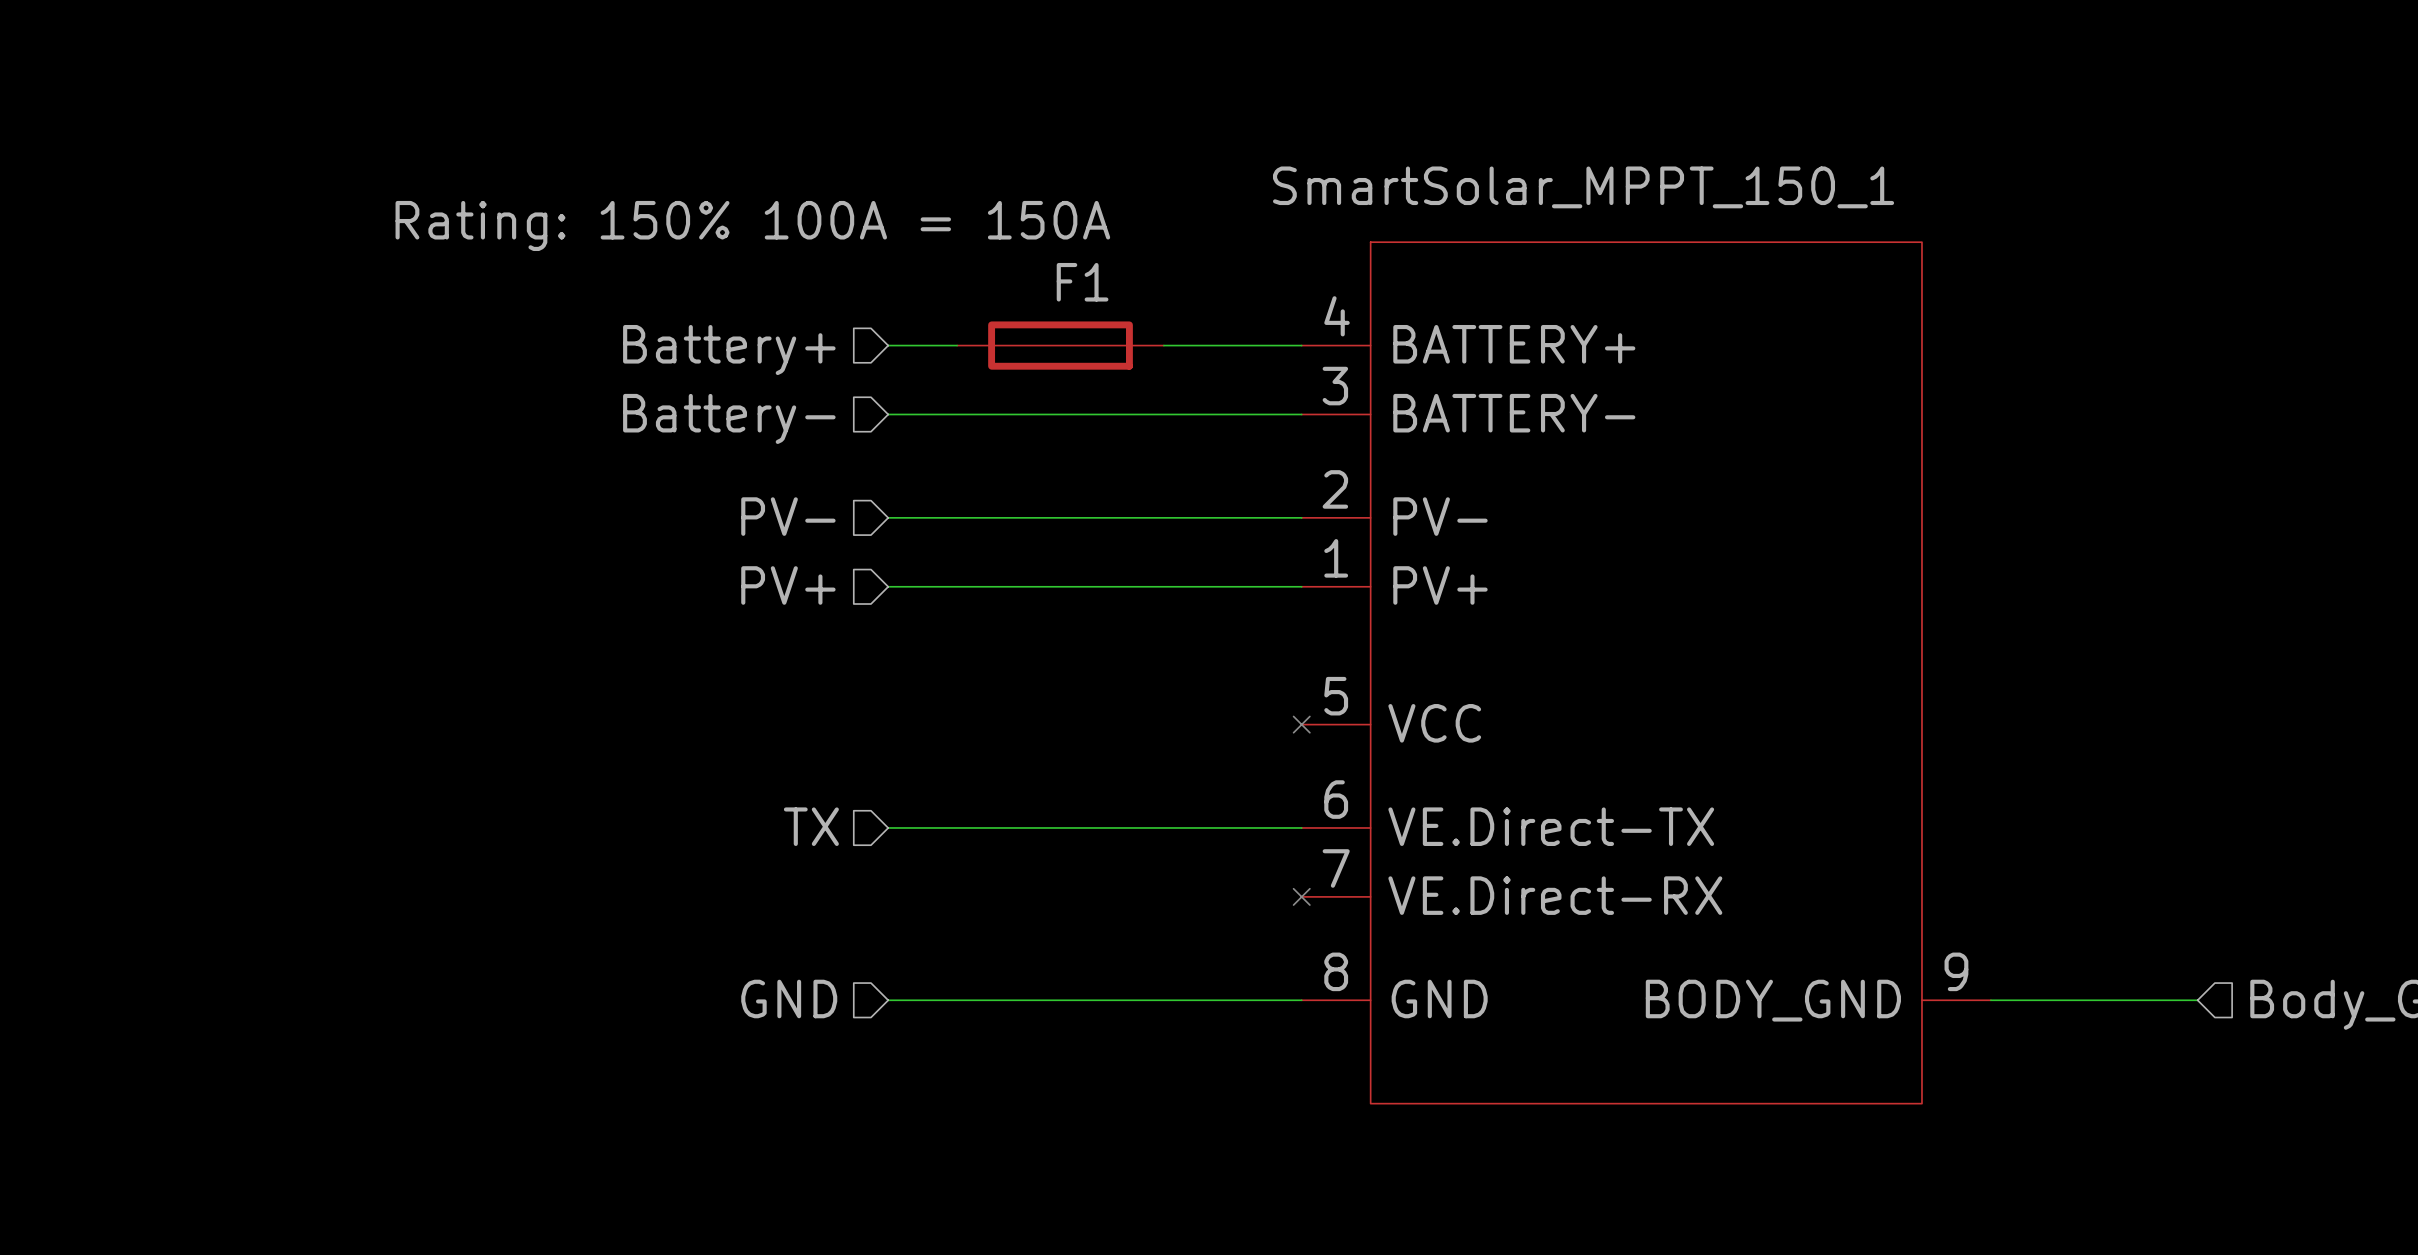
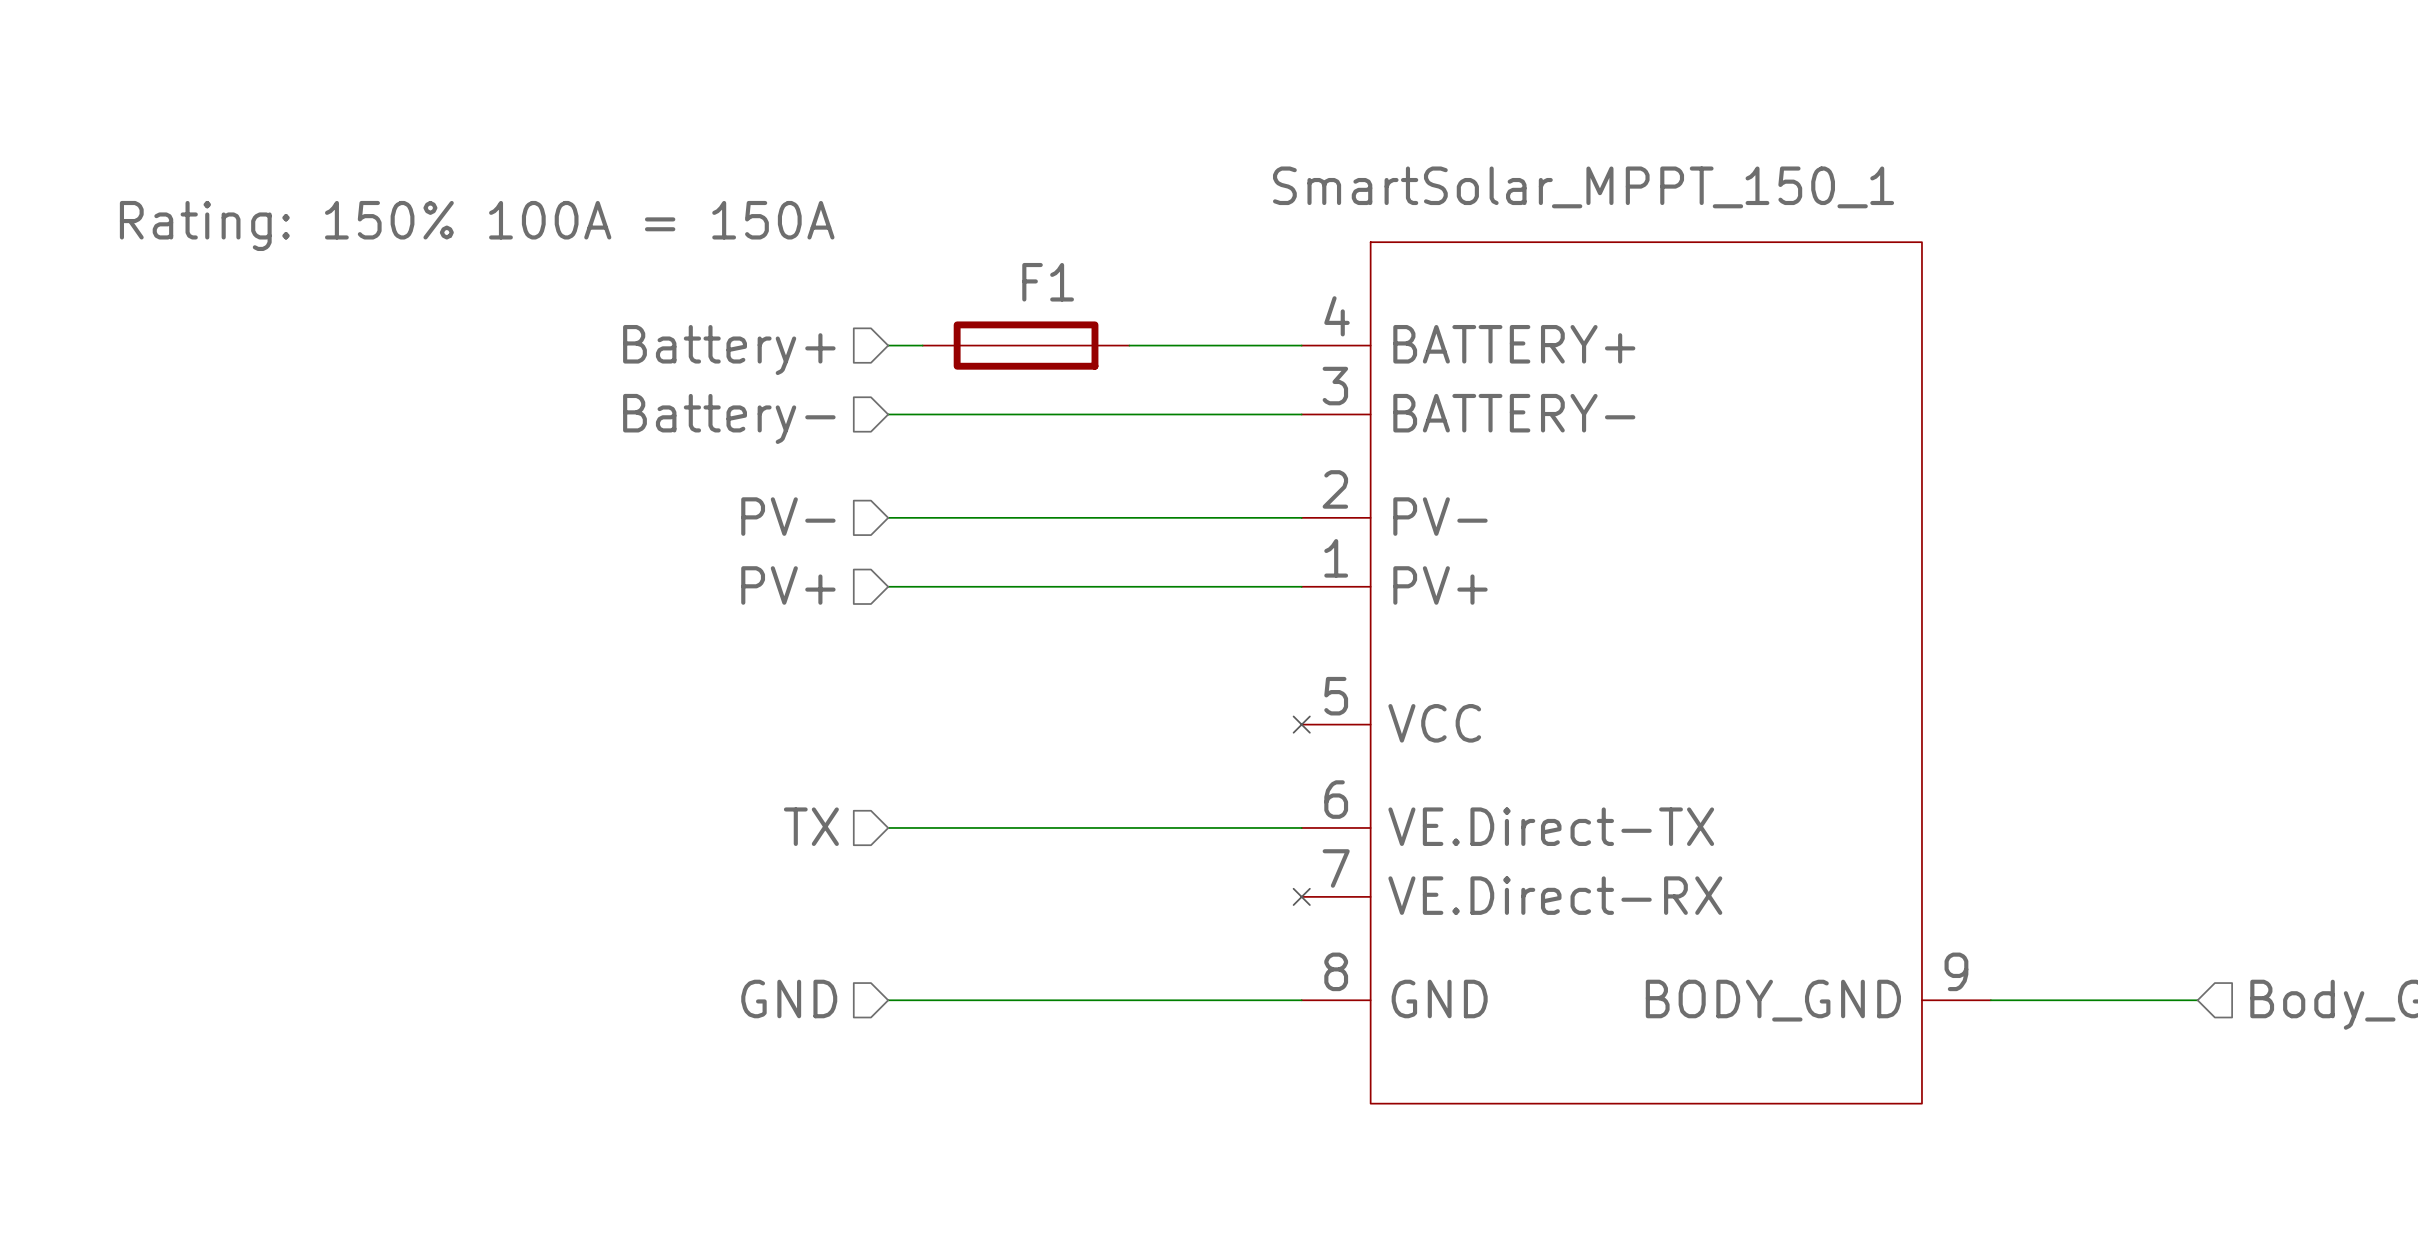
part text position: Rating: 150% 100A = 150A (752, 225) -> Rating: 150% 100A = 150A (477, 225)
part position: (1060, 345) -> (1026, 345)

